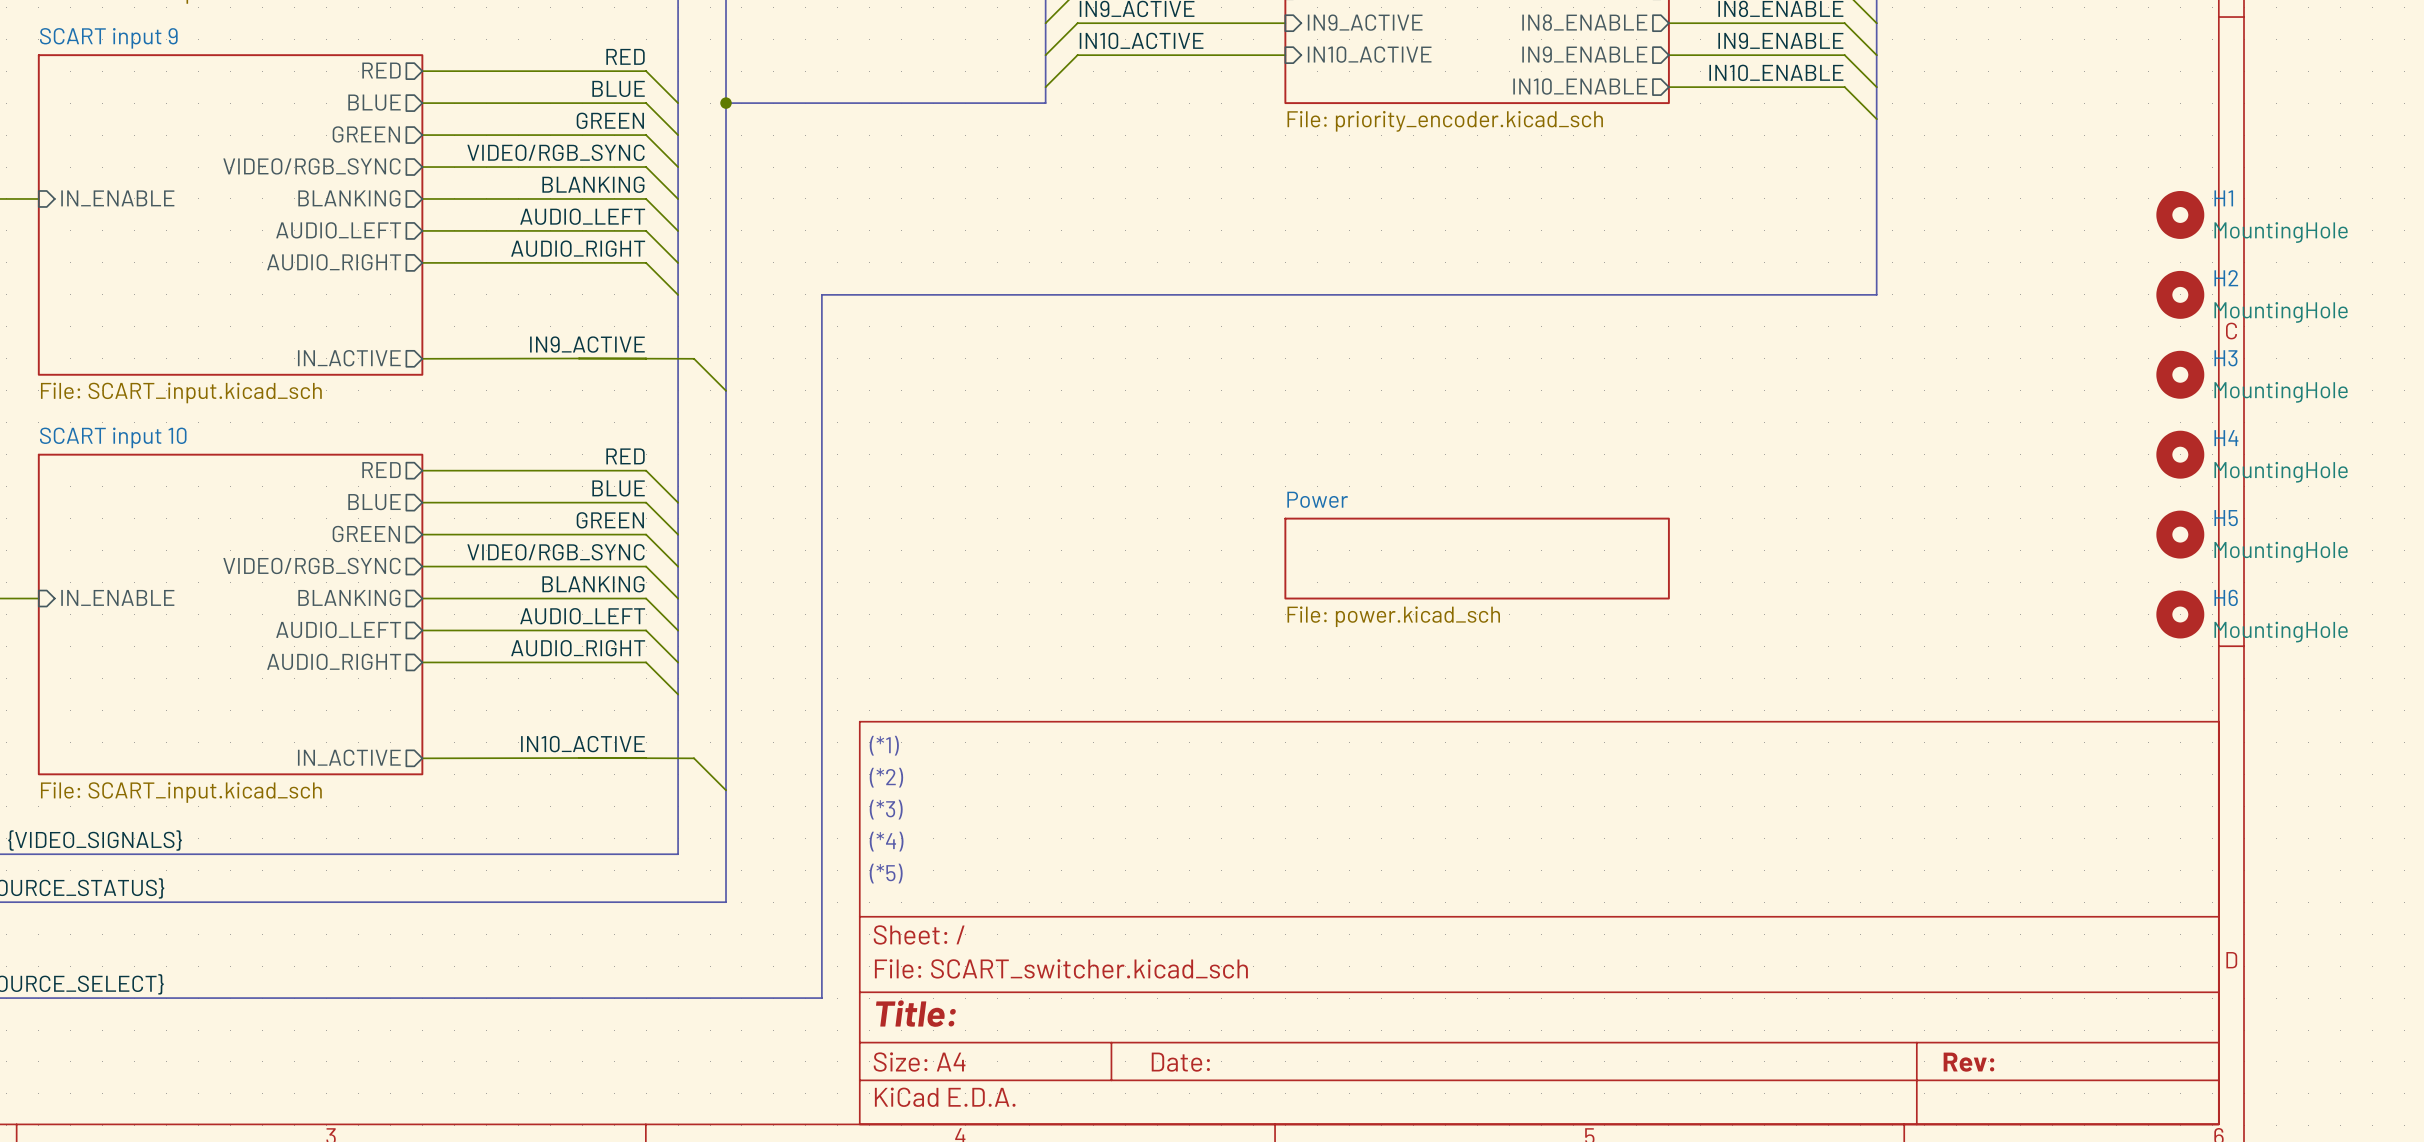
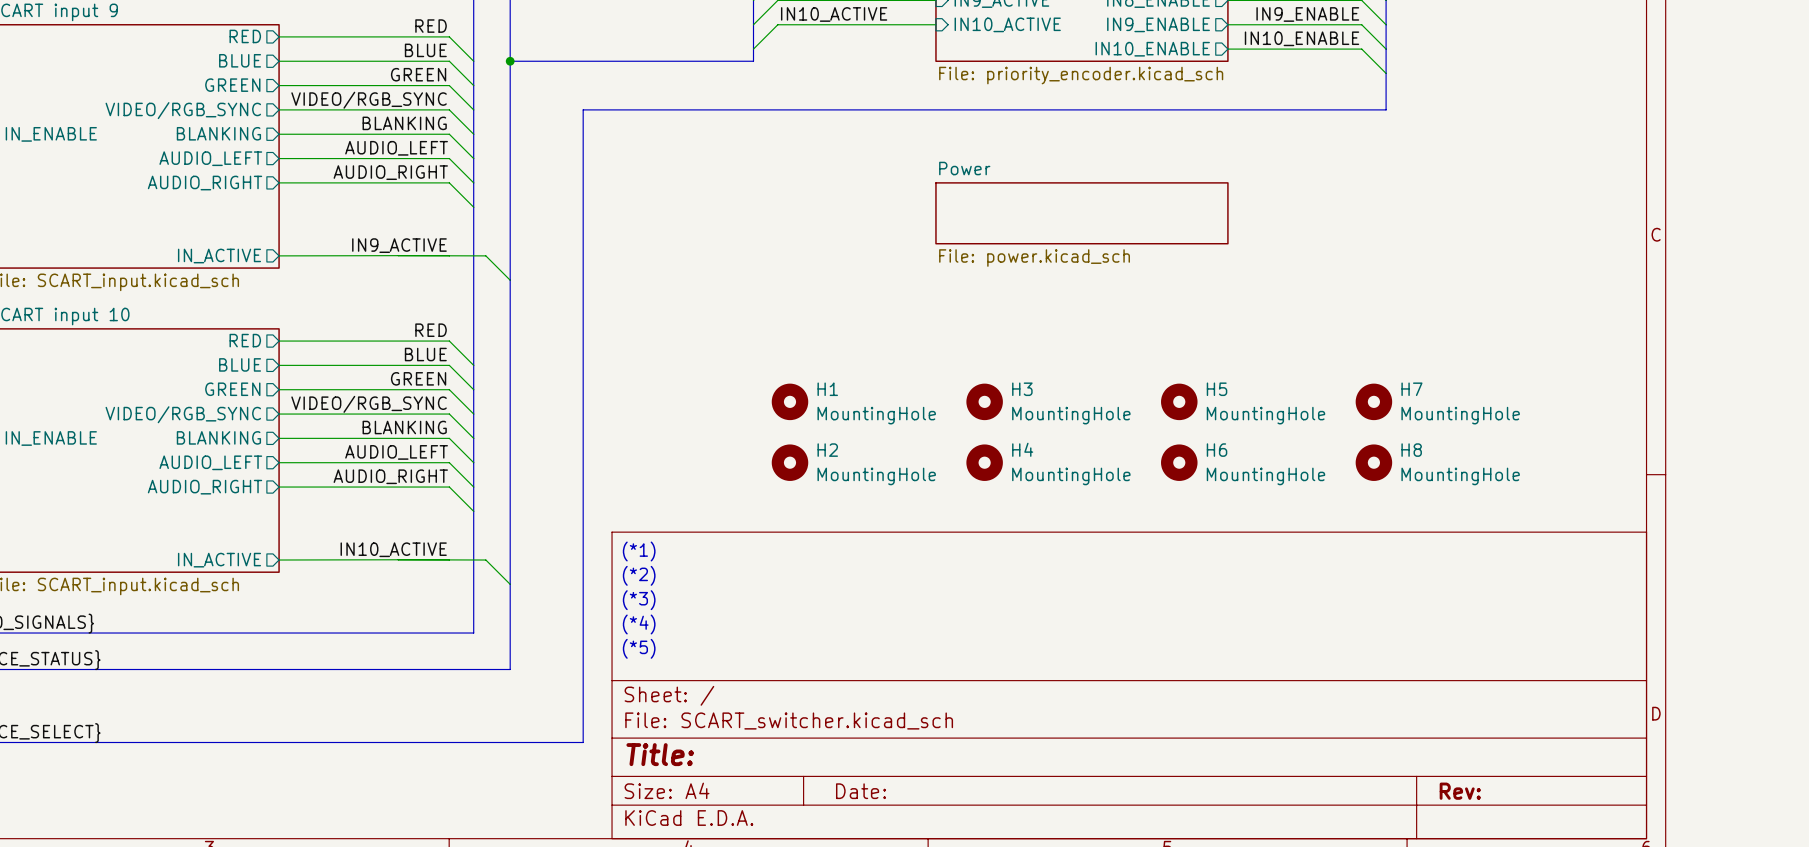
bus: (1876, 167) (1876, 294) (821, 294) -> (1386, 109) (583, 109) (583, 207)
H1 position: (2180, 214) -> (789, 401)
H2 position: (2180, 294) -> (789, 462)
H3 position: (2180, 374) -> (984, 401)
H4 position: (2180, 454) -> (984, 462)
H5 position: (2180, 534) -> (1179, 401)
H7: none -> MountingHole (1373, 401)
sheet Power position: (1477, 558) -> (1081, 213)
H6 position: (2180, 614) -> (1179, 462)
H8: none -> MountingHole (1373, 462)

